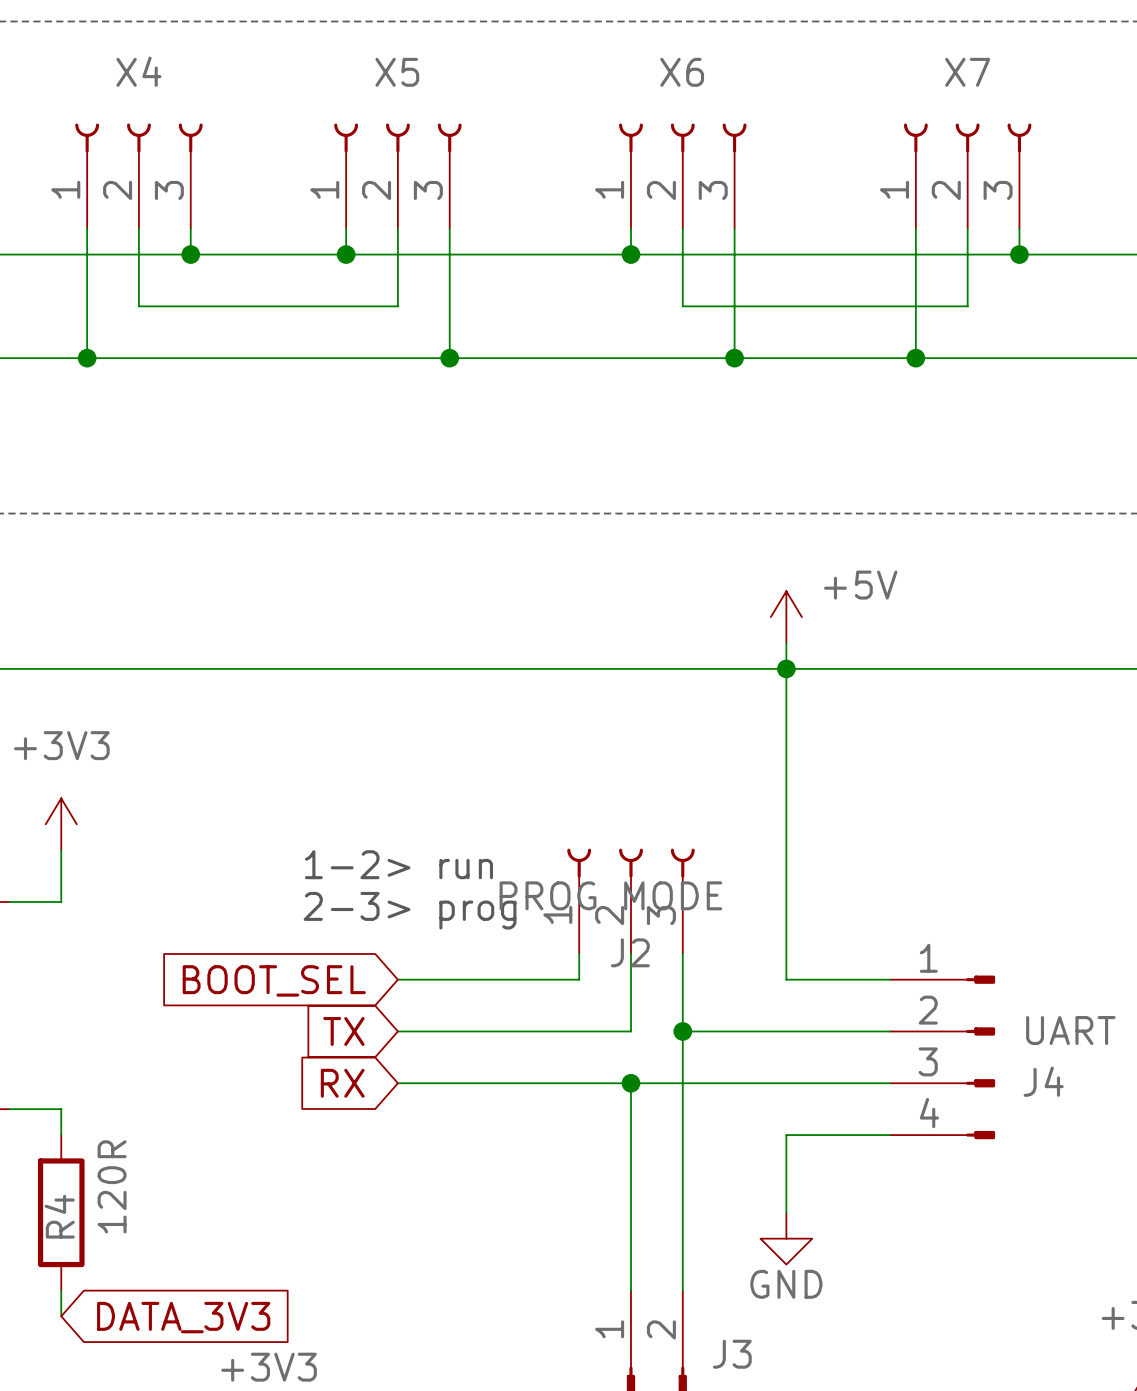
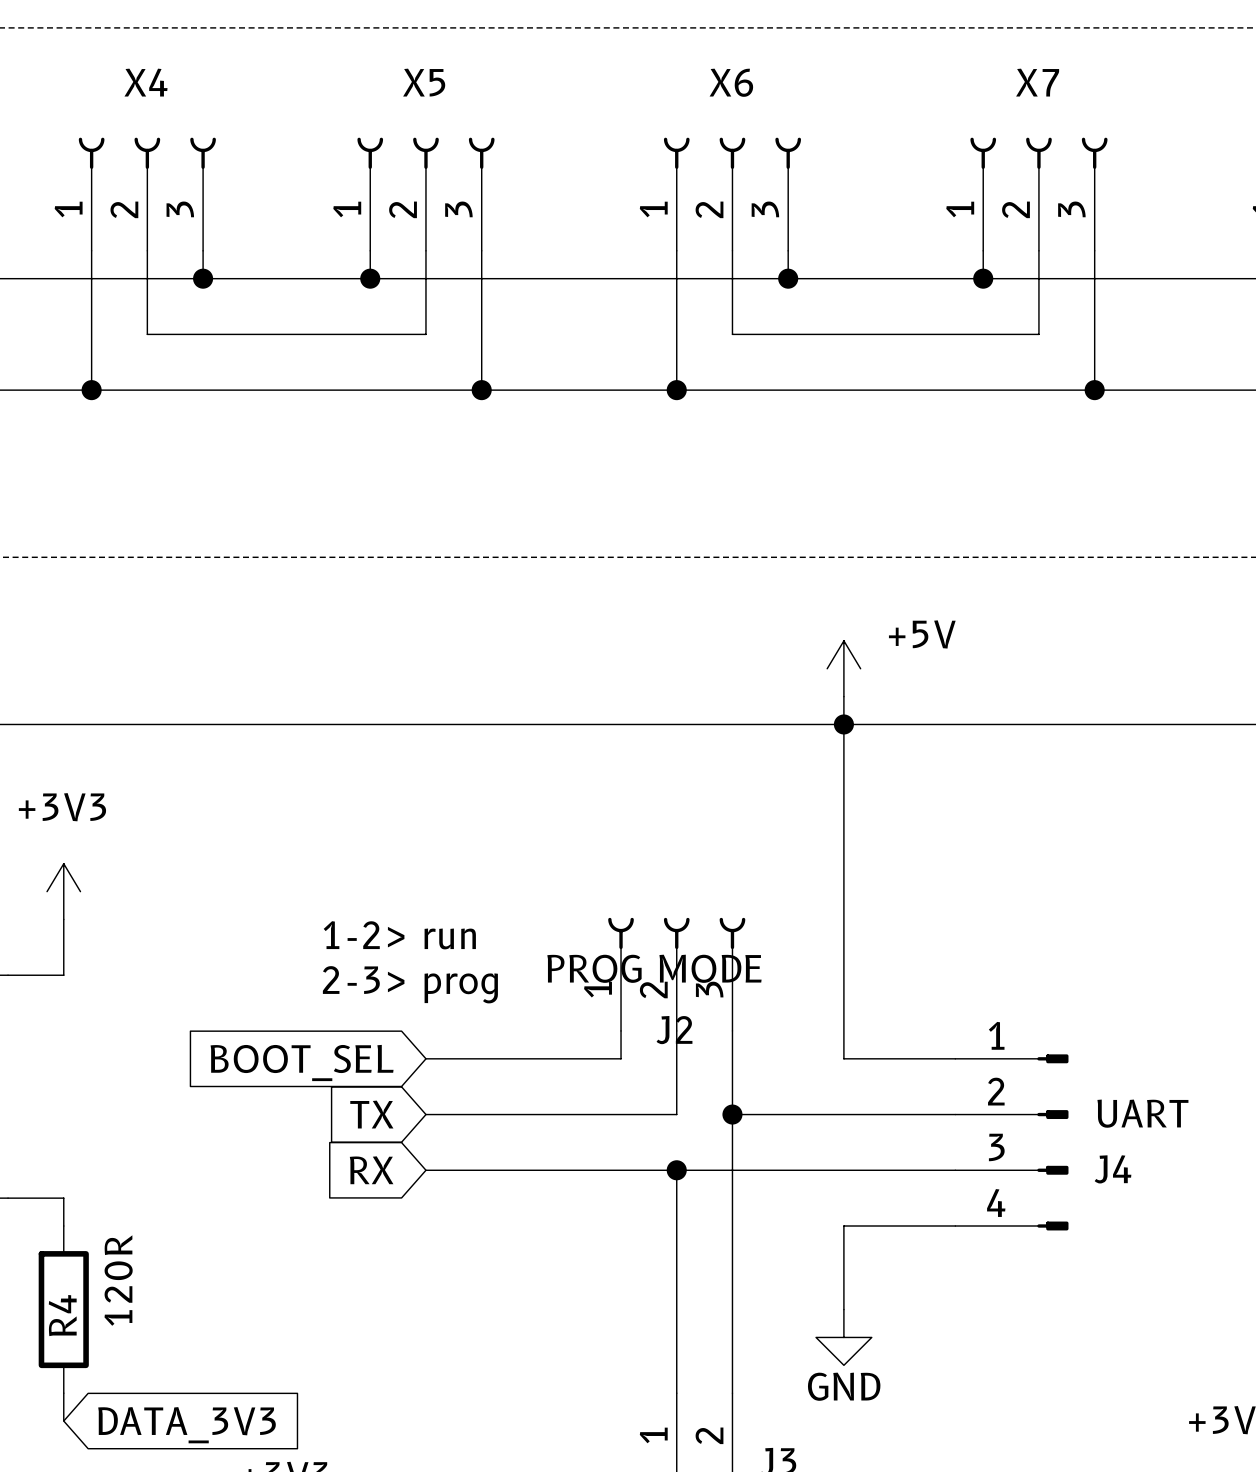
junction: (630, 254) -> none
wire: (734, 254) (734, 358) -> (676, 278) (676, 390)
junction: none -> (788, 278)
wire: (915, 254) (915, 358) -> (1094, 278) (1094, 390)
junction: none -> (983, 278)
junction: (1019, 254) -> none
junction: none -> (676, 390)
junction: (734, 358) -> none
junction: (915, 358) -> none
junction: none -> (1094, 390)

